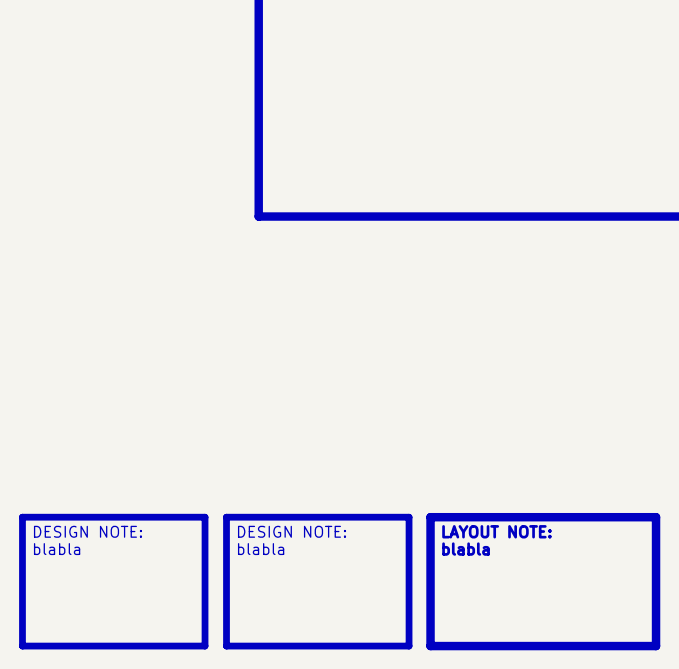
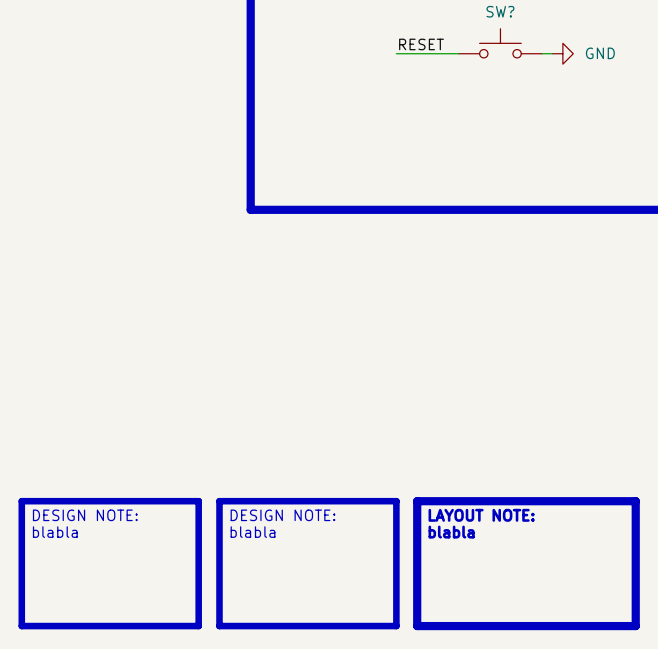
SW?: none -> (500, 43)
label: none -> RESET (421, 44)
wire: none -> (396, 53) (458, 53)
wire: none -> (542, 53) (552, 53)
power symbol: none -> GND (562, 53)

